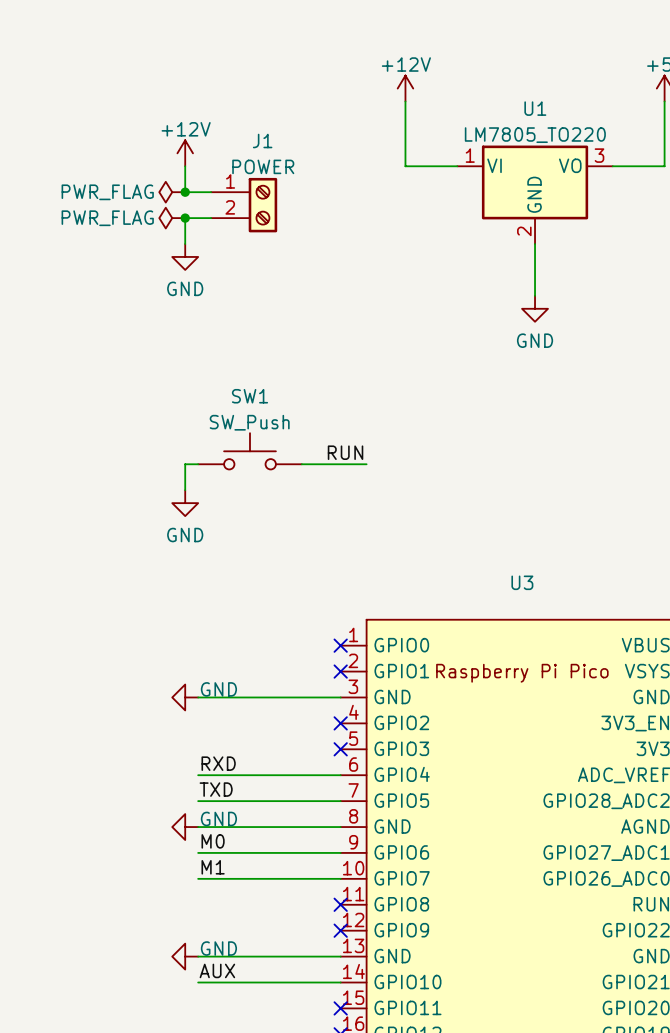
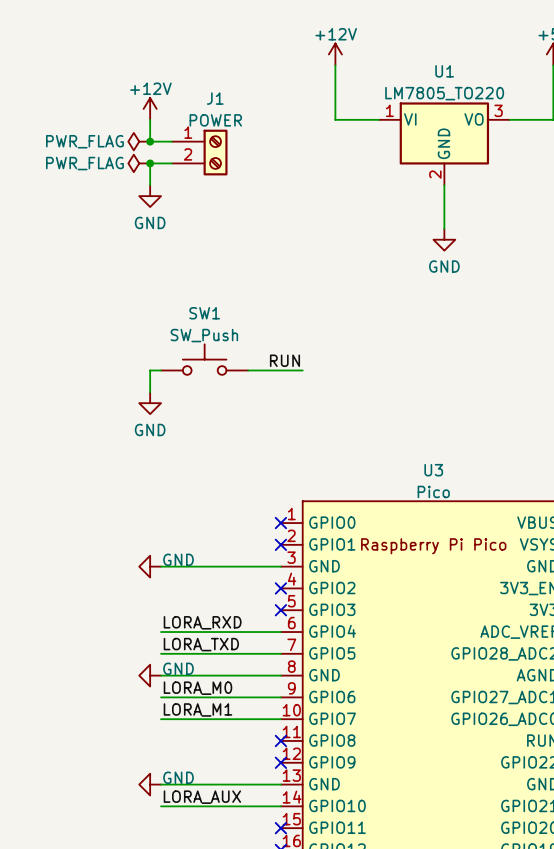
U3 value: none -> Pico (433, 491)
label: RXD (218, 763) -> LORA_RXD (202, 622)
label: TXD (216, 789) -> LORA_TXD (201, 644)
label: M0 (213, 841) -> LORA_M0 (197, 688)
label: M1 (213, 867) -> LORA_M1 (197, 709)
label: AUX (217, 970) -> LORA_AUX (202, 797)

